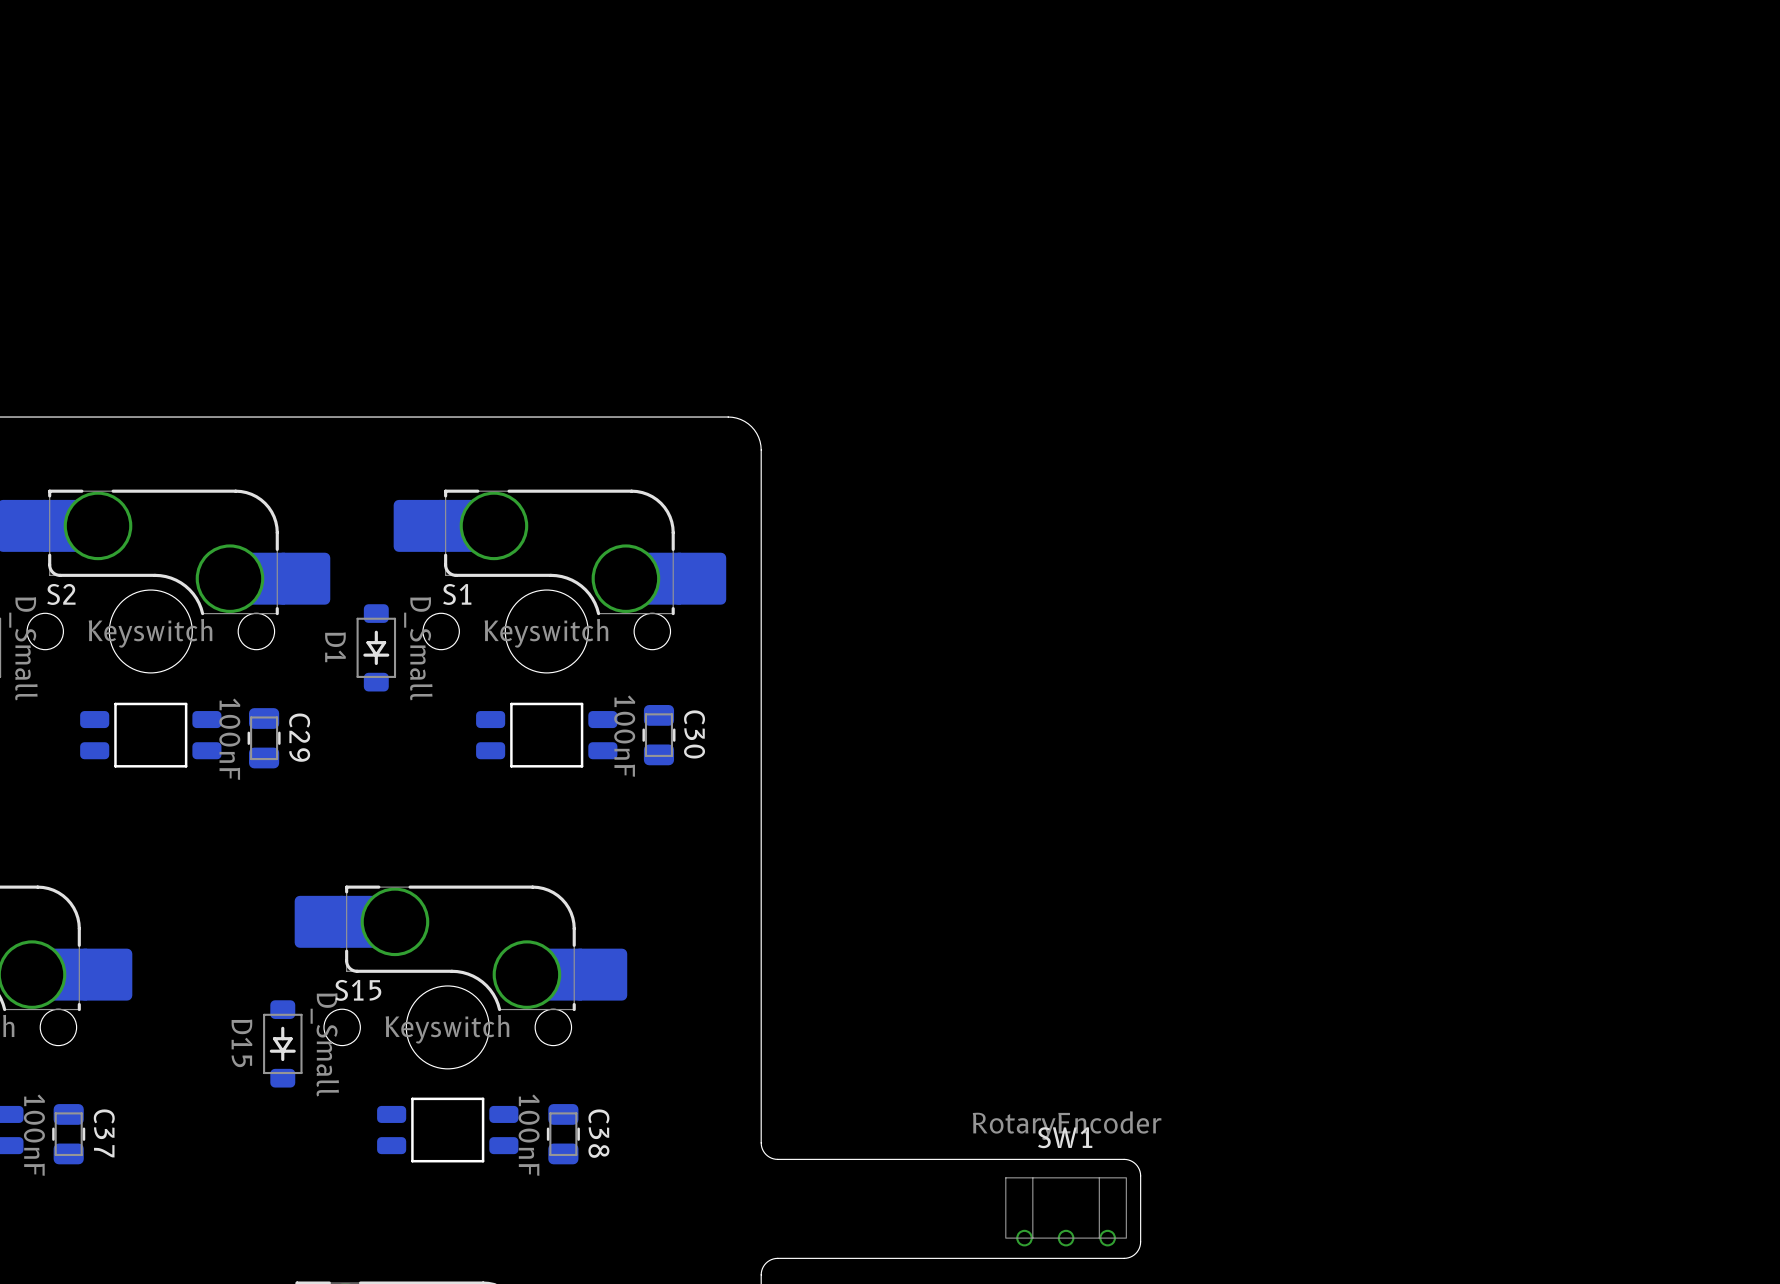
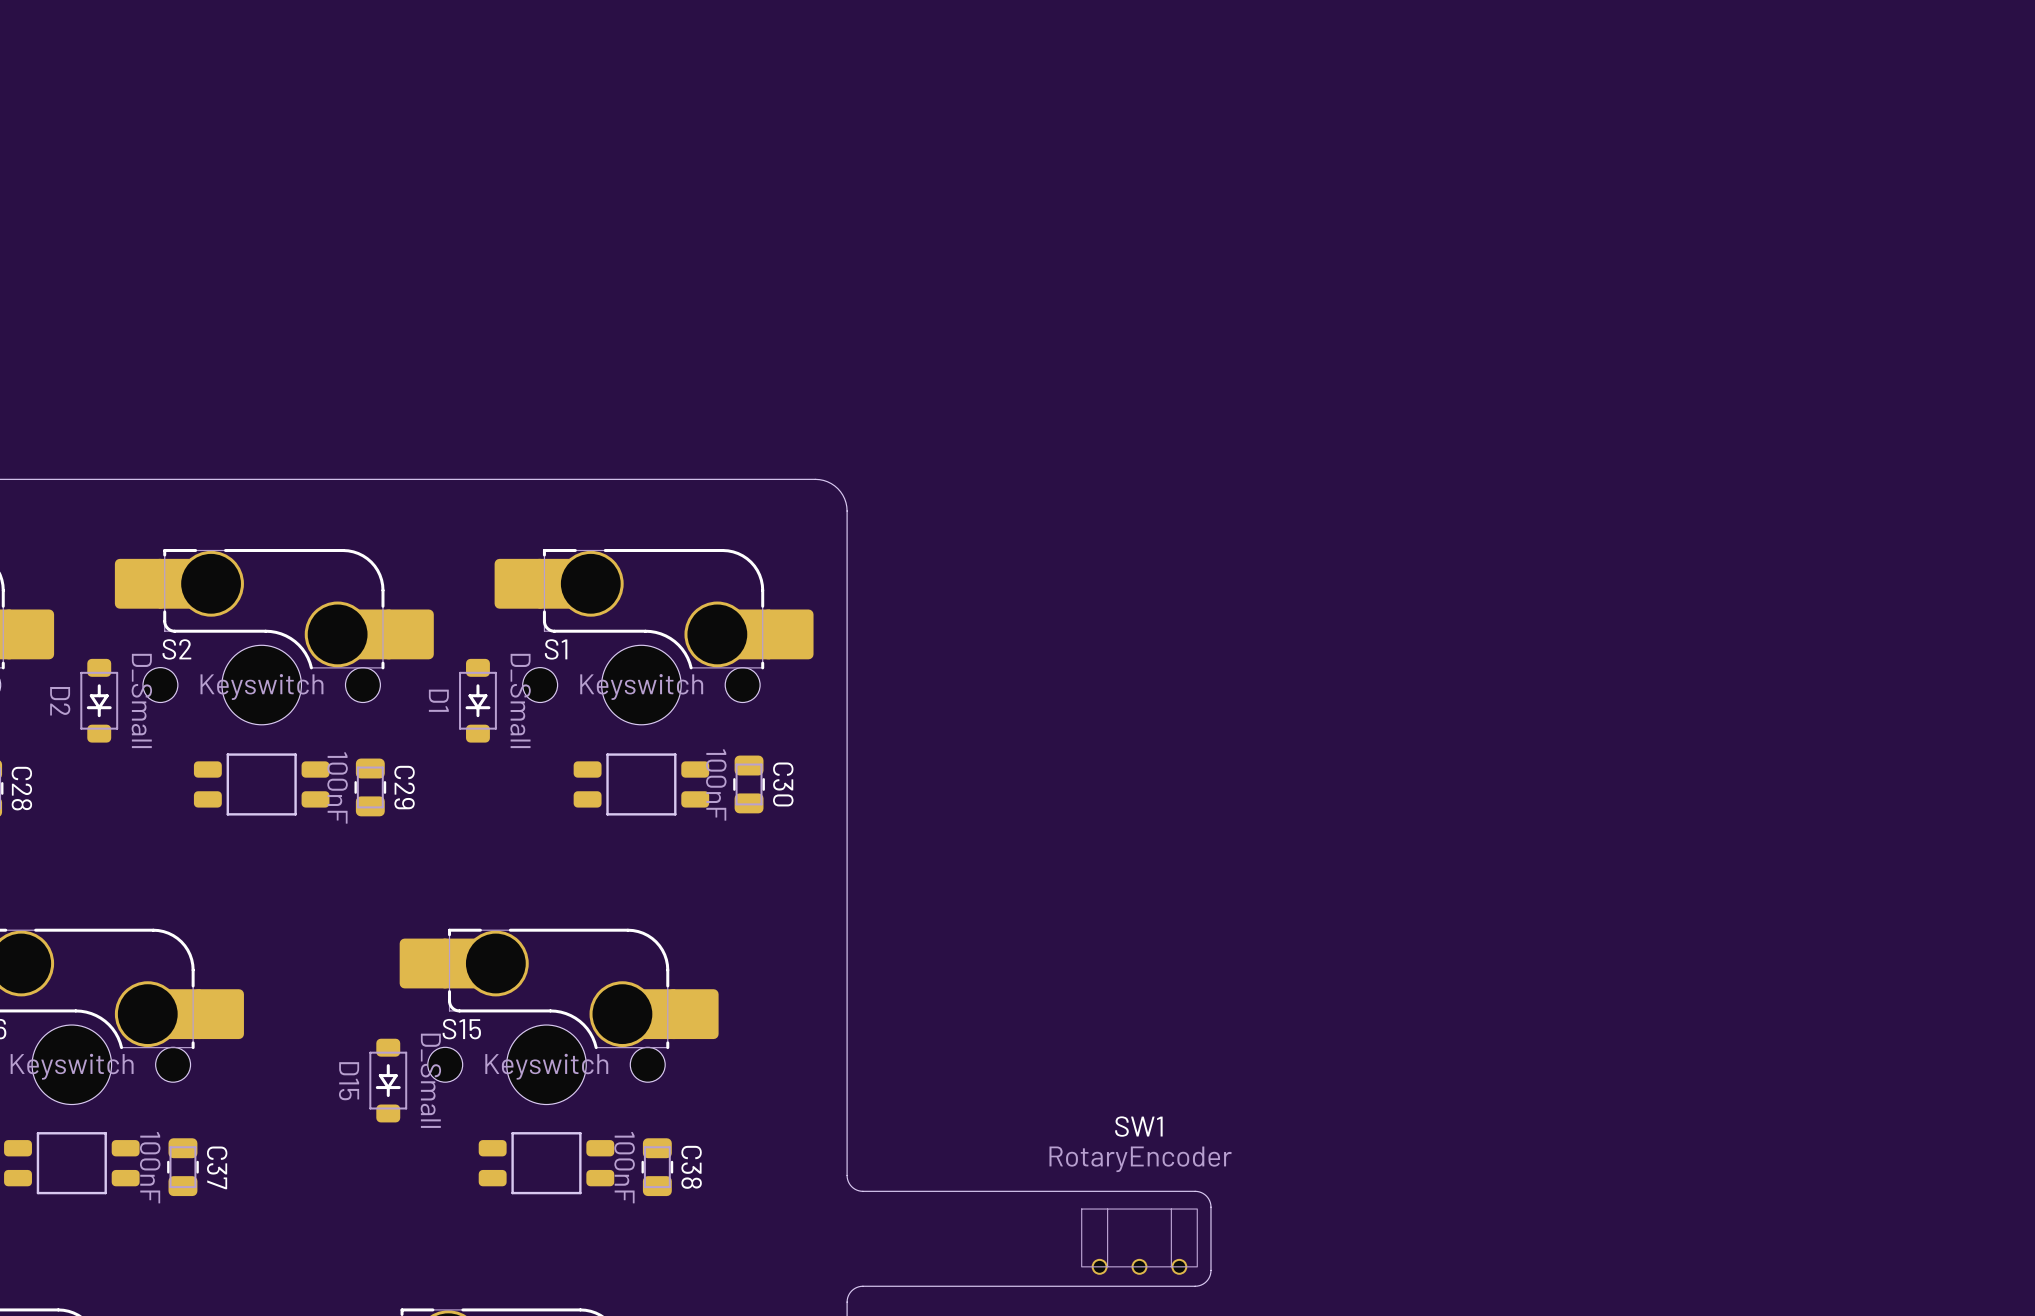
SW1 name position: SW1 (1065, 1137) -> SW1 (1138, 1126)

